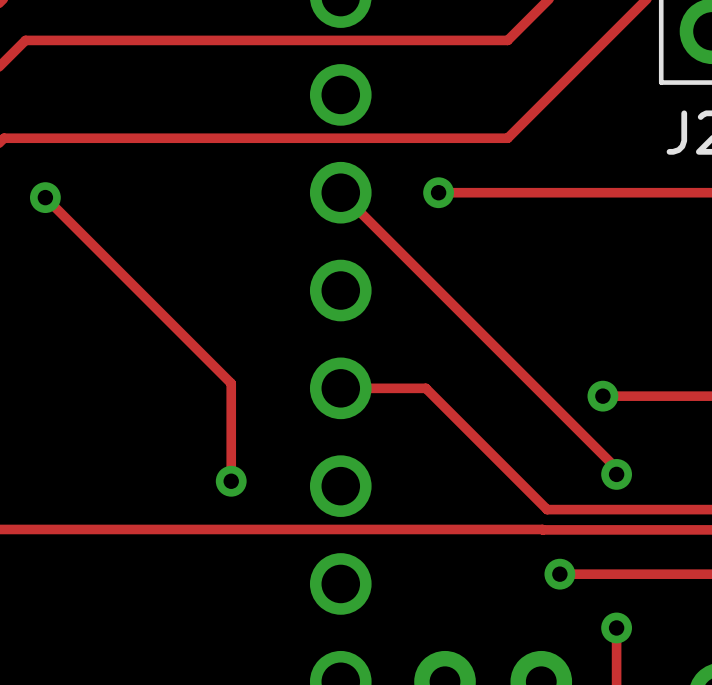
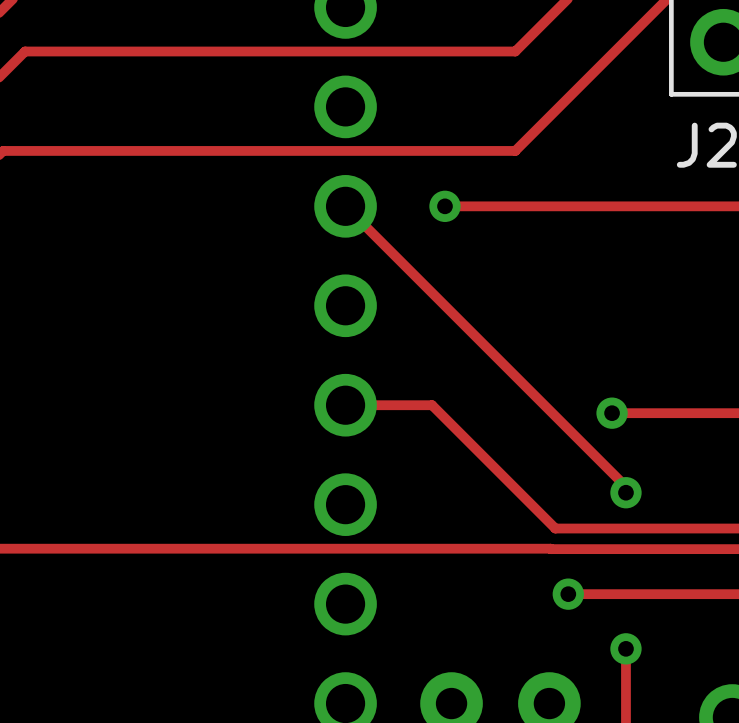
track: (45, 197) (231, 383) (231, 481) -> none
via: (45, 197) -> none
via: (231, 481) -> none

